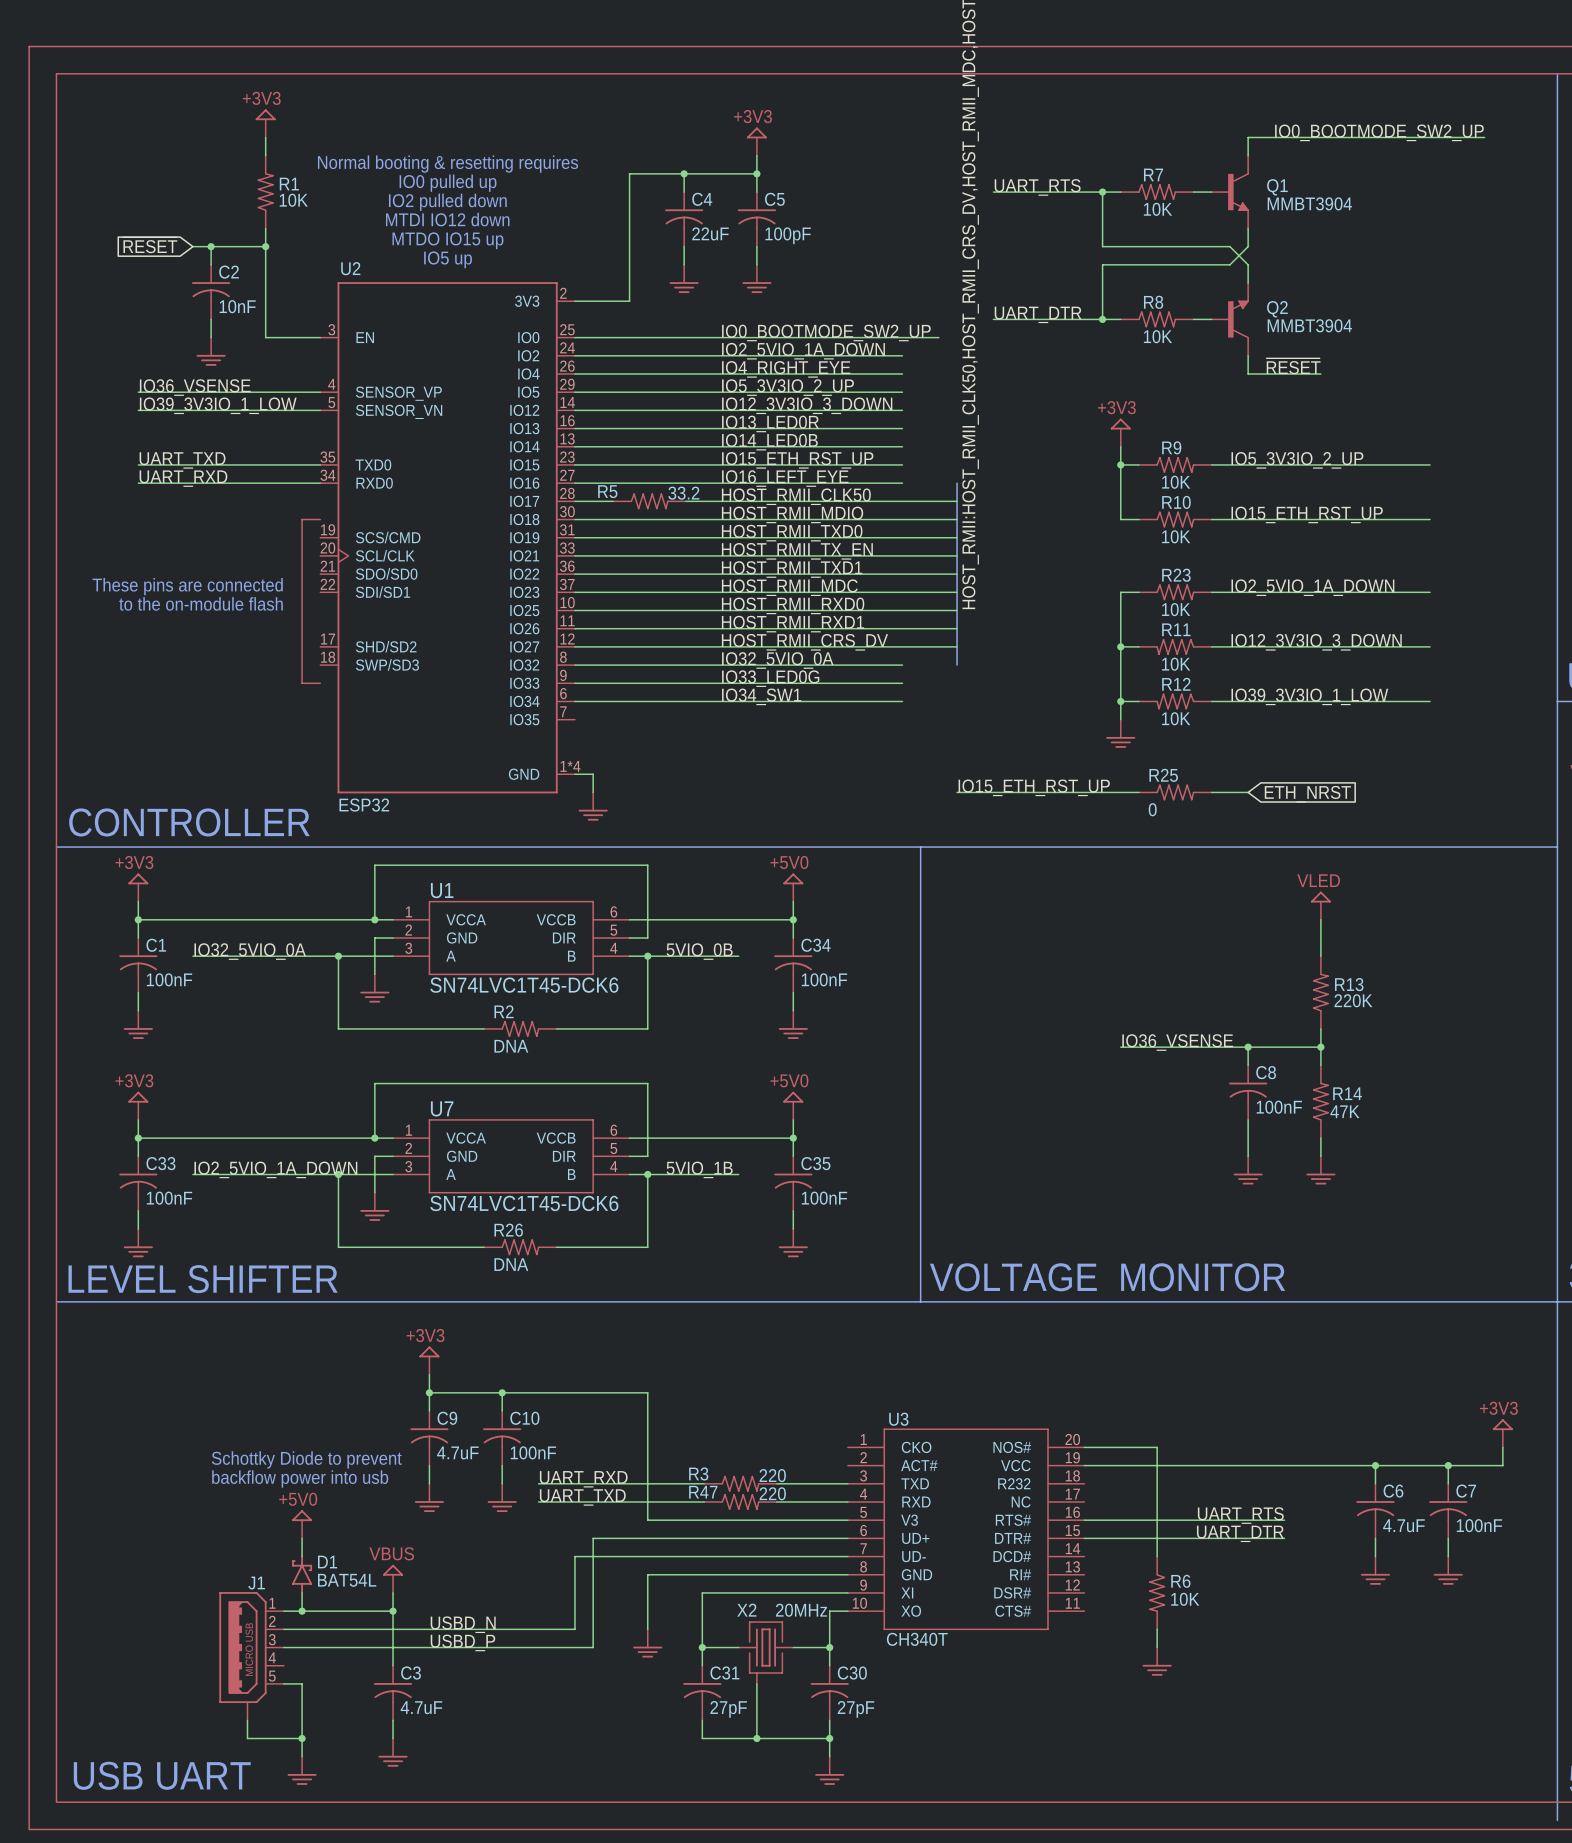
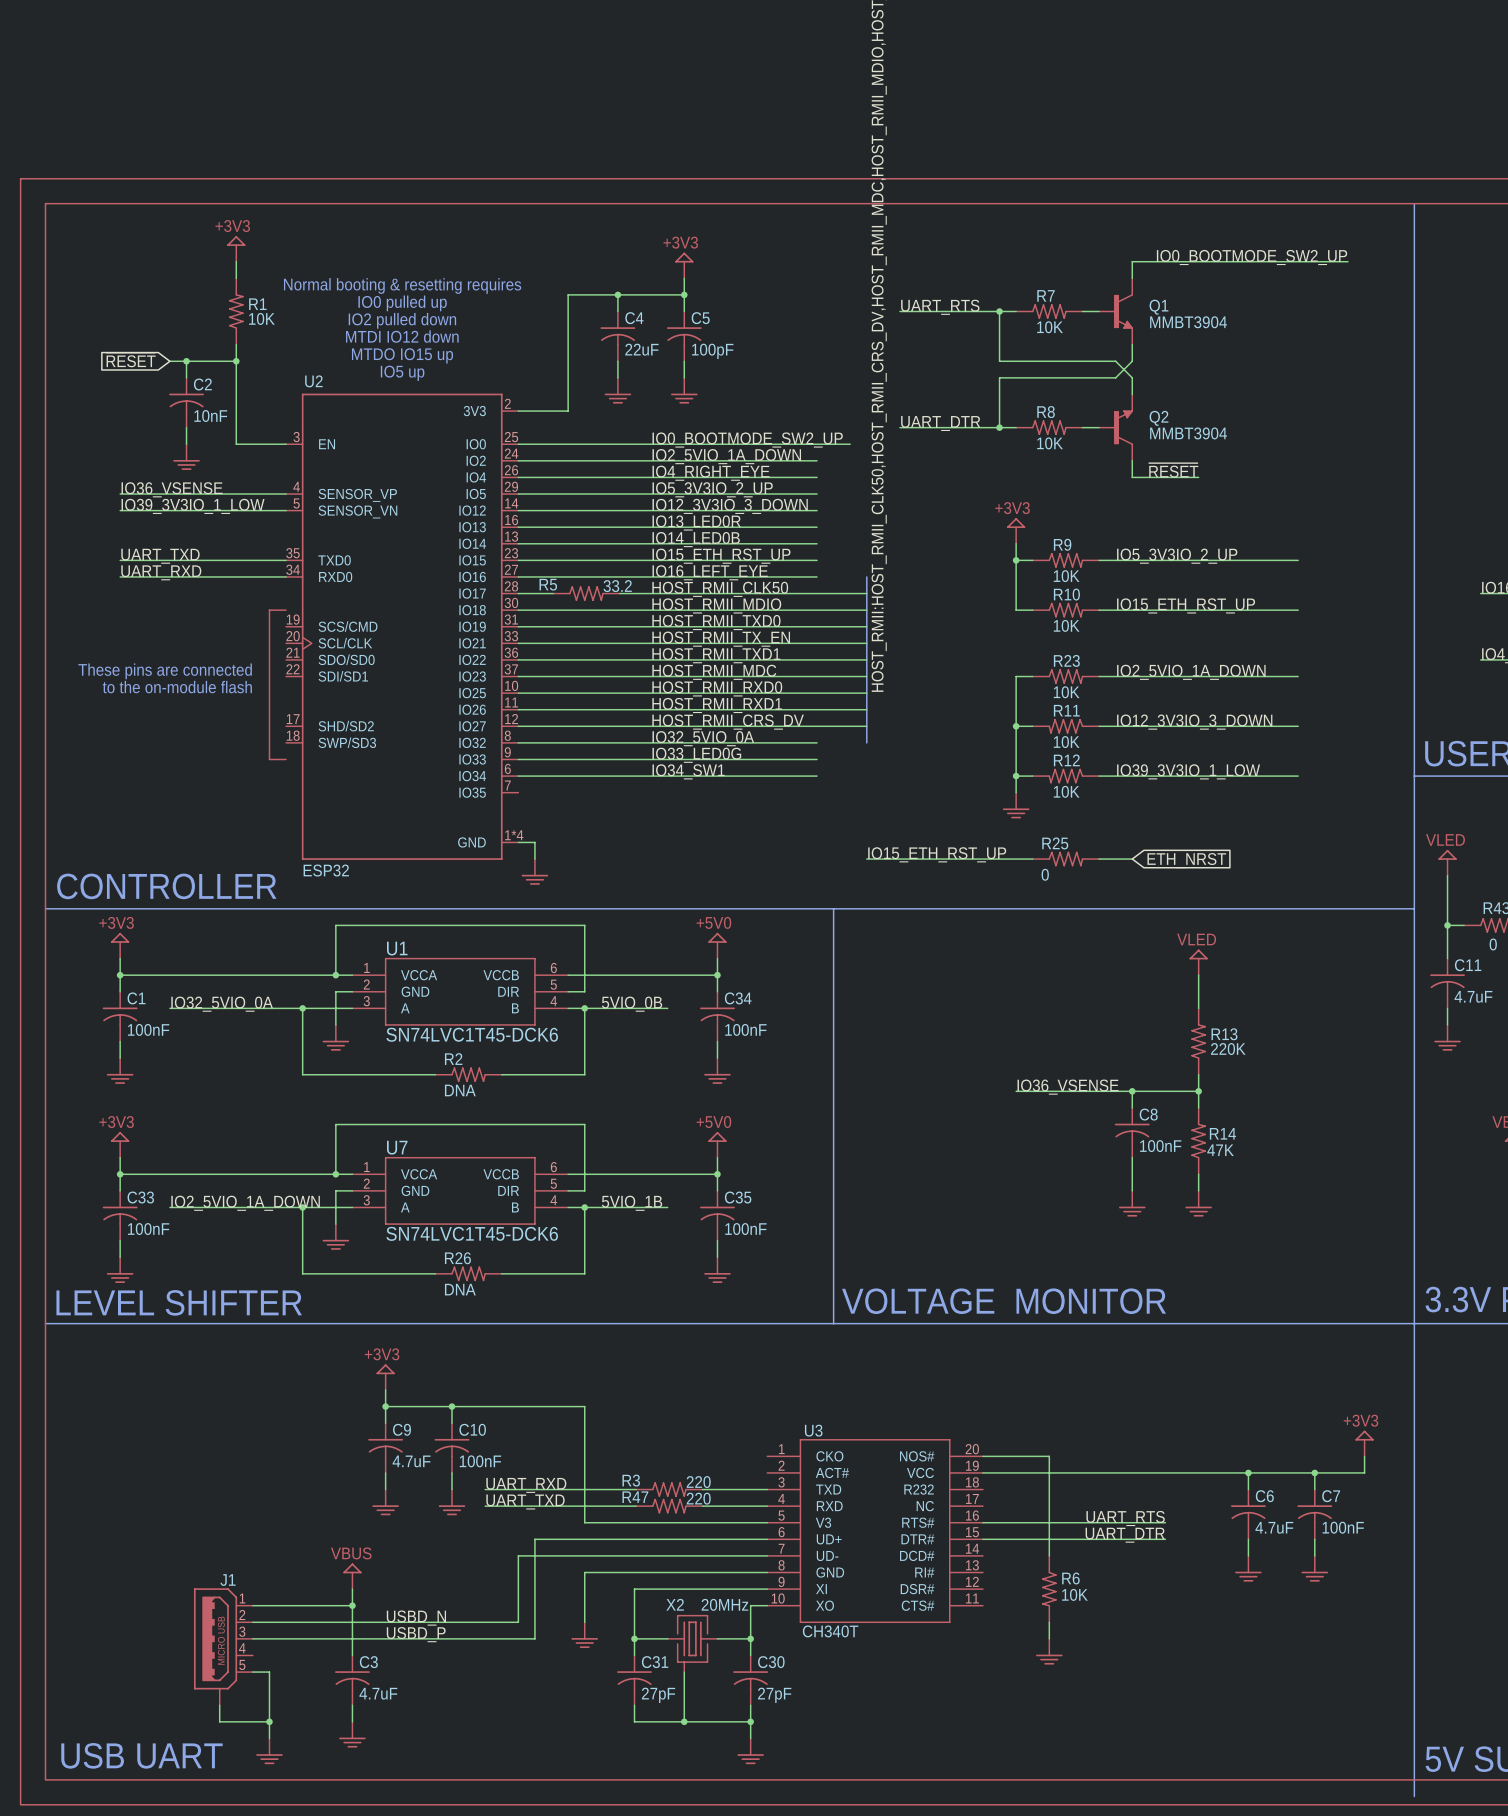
text: Schottky Diode to prevent (306, 1459) -> none
text: backflow power into usb (300, 1479) -> none
power symbol: (302, 1524) -> none
wire: (302, 1538) (302, 1556) -> none
D1: BAT54L (302, 1574) -> none
wire: (302, 1592) (302, 1611) -> none
junction: (302, 1611) -> none

